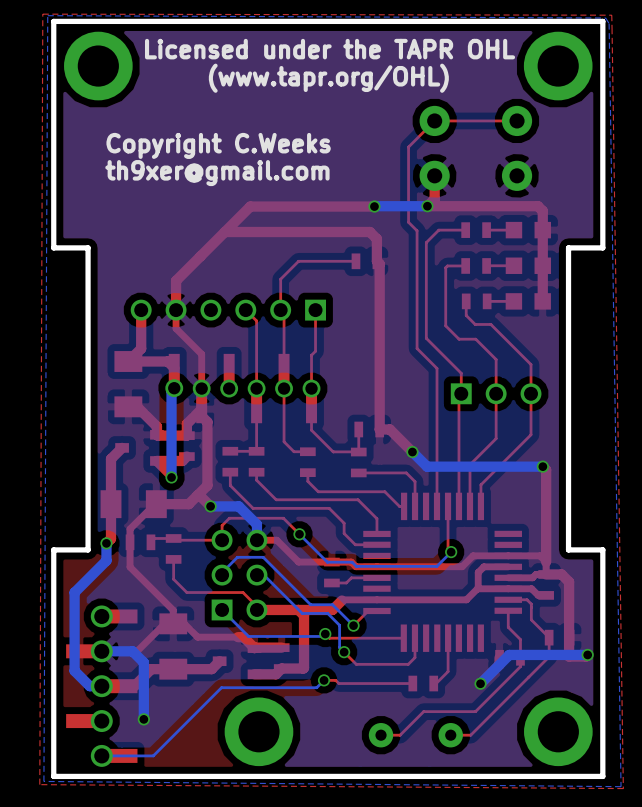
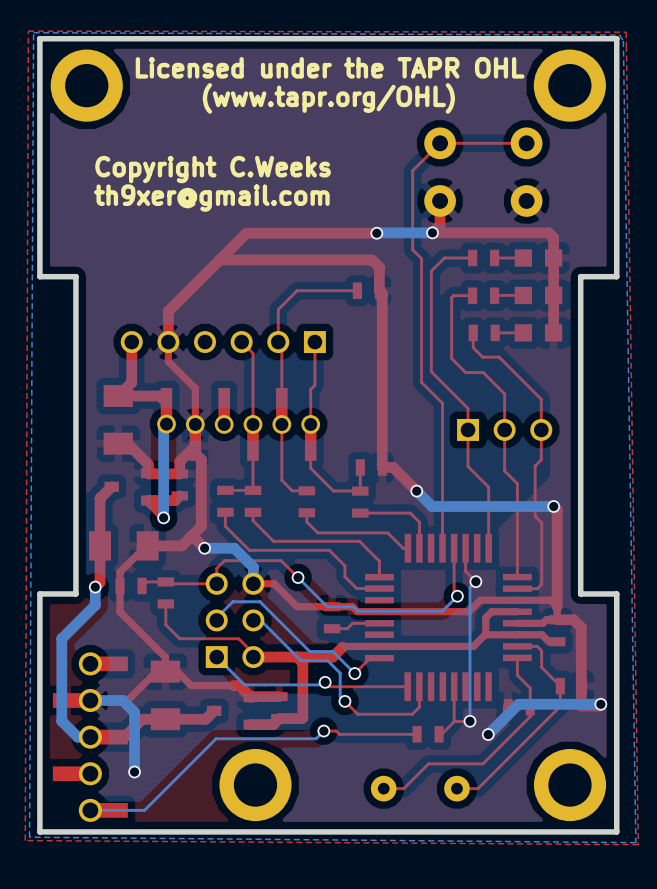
top track: none -> (468, 429) (468, 466) (488, 487) (488, 525)
top track: (458, 396) (458, 506) -> (475, 581) (465, 571) (465, 548)
top track: (531, 422) (531, 434) (480, 484) -> (541, 459) (535, 465) (535, 516) (541, 522) (541, 584) (537, 588) (517, 588)
top track: (496, 432) (496, 438) (469, 464) (469, 506) -> (504, 470) (517, 483) (517, 577)
bottom track: none -> (475, 581) (470, 587) (470, 721)
via: none -> (475, 581)
top track: none -> (470, 721) (454, 721)
via: none -> (470, 721)

